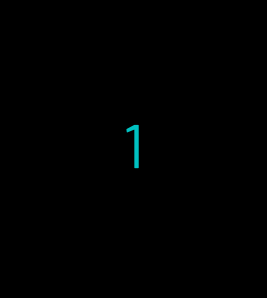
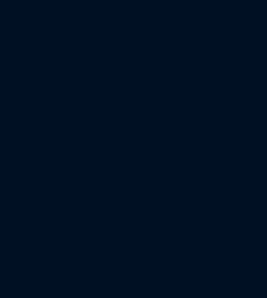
text: 1 (132, 146) -> none

